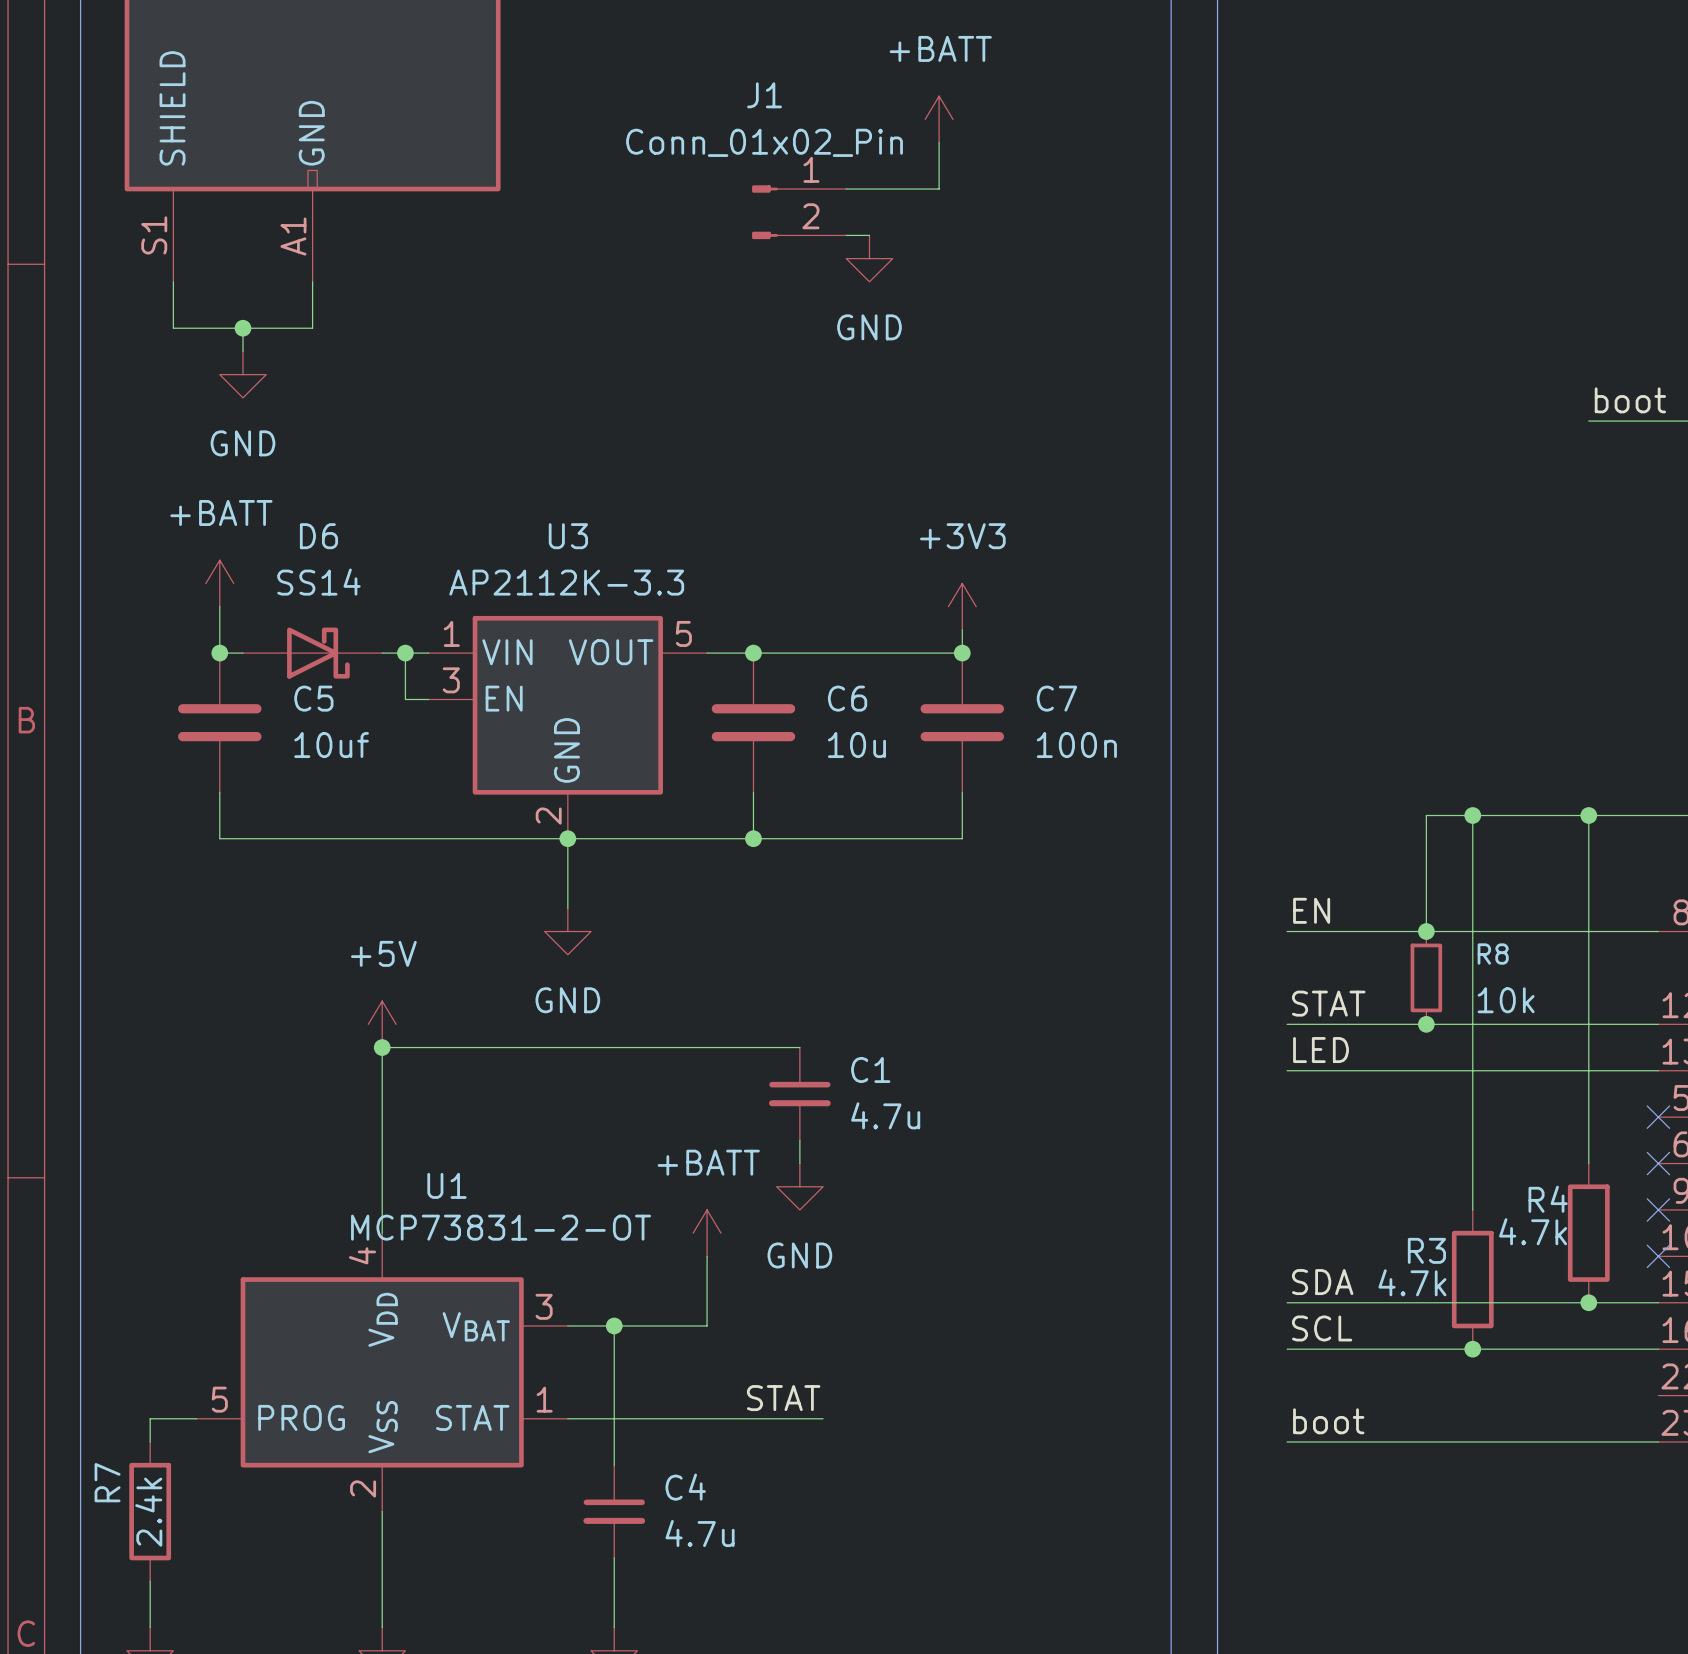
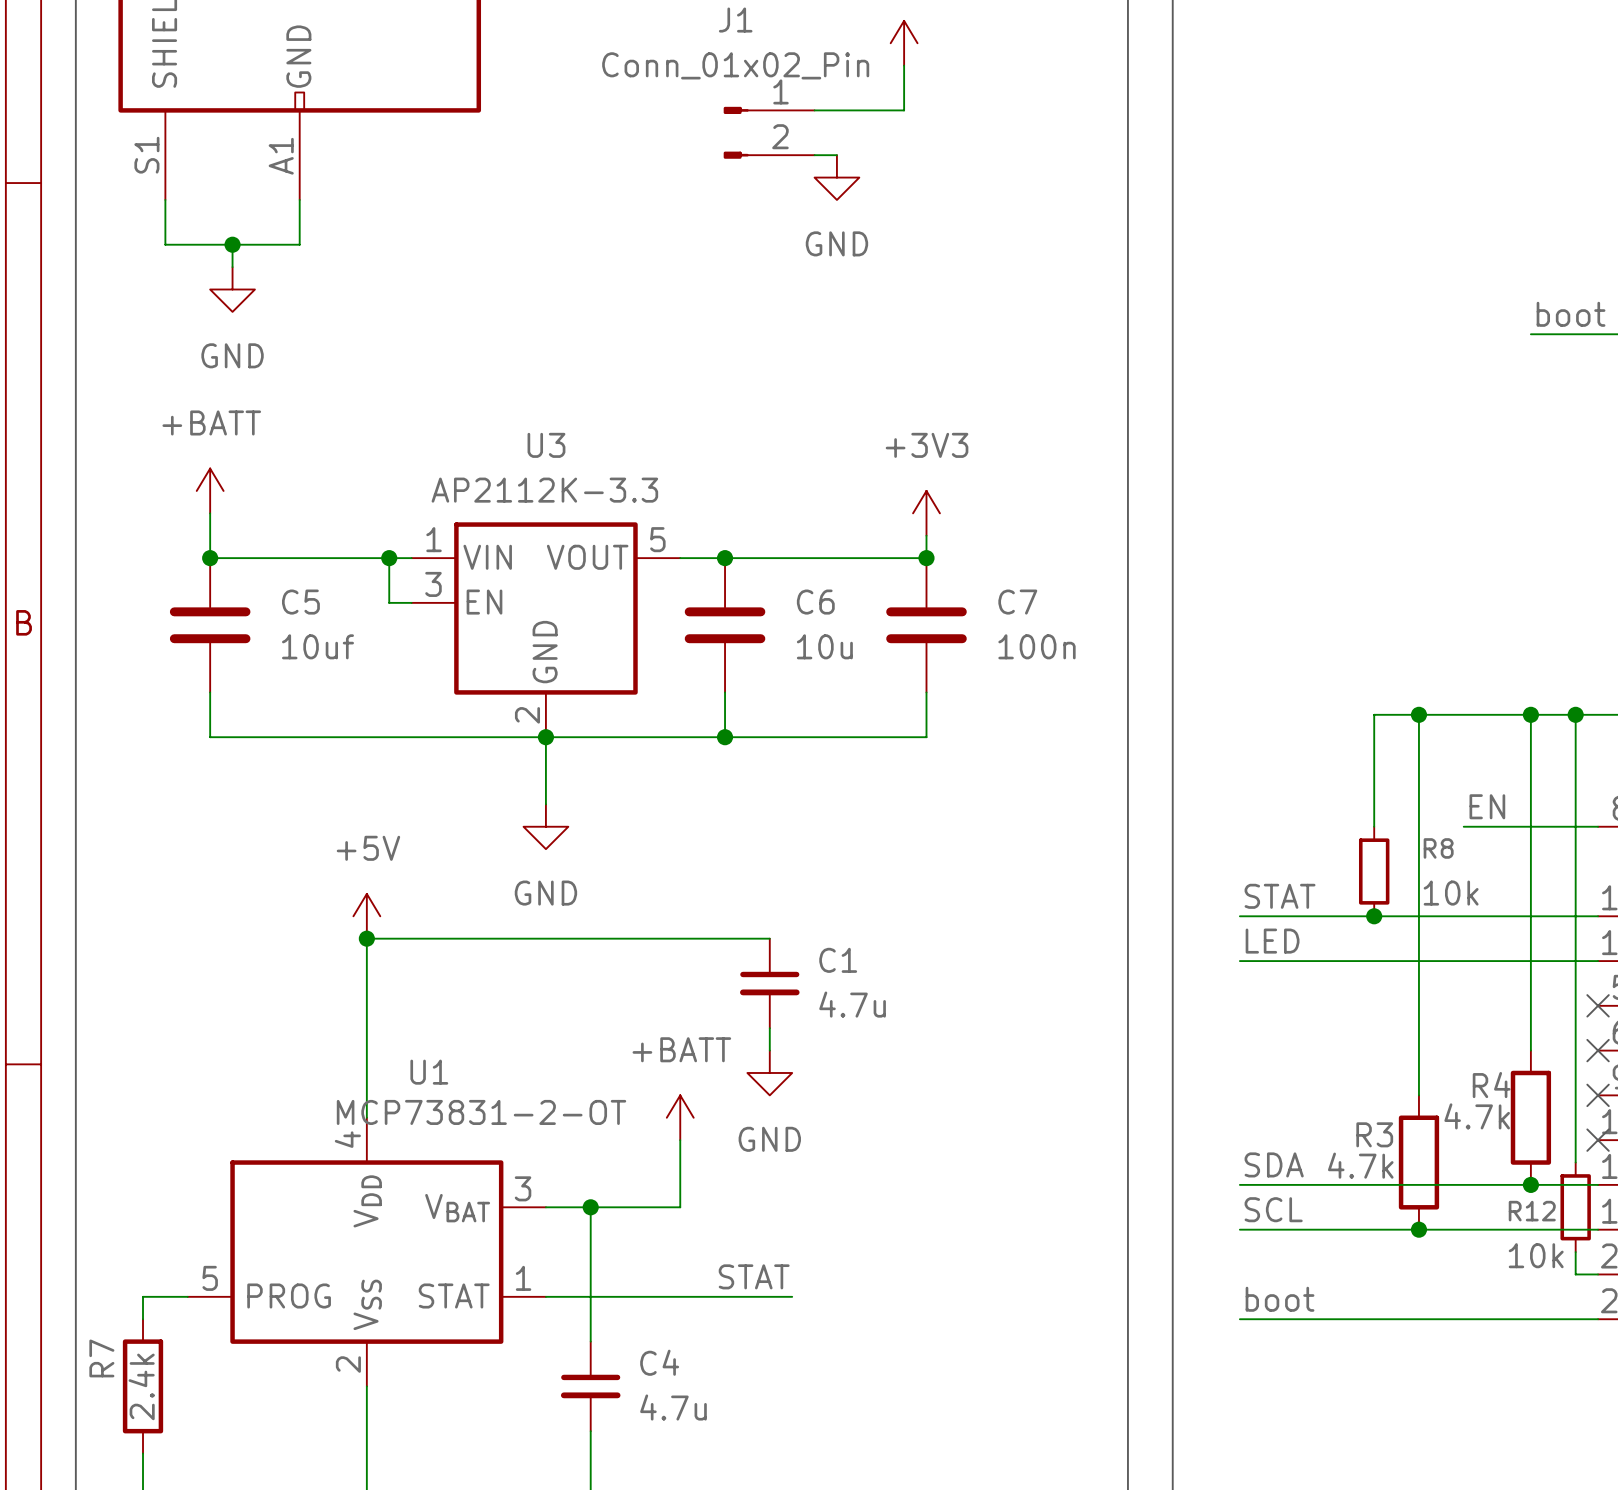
D6: SS14 (312, 653) -> none
wire: none -> (1575, 714) (1575, 1162)
junction: none -> (1575, 714)
label position: EN (1311, 910) -> EN (1487, 806)
wire: (1287, 931) (1519, 931) -> none
junction: (1426, 931) -> none
R12: none -> 10k (1575, 1207)
wire: none -> (1575, 1252) (1575, 1274) (1598, 1274)

